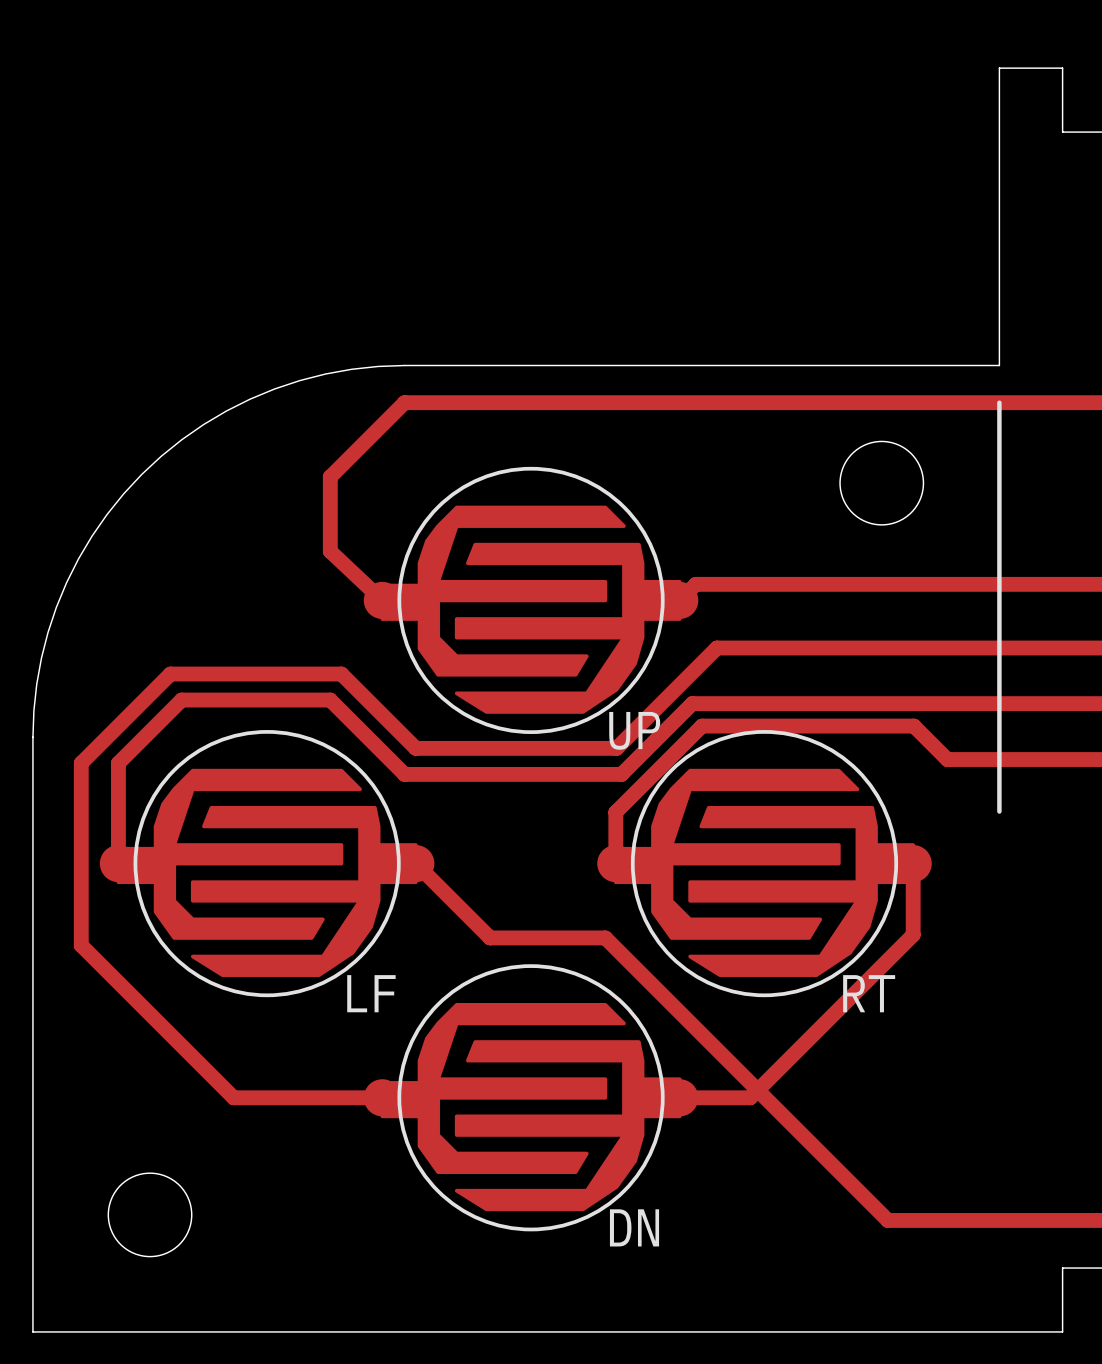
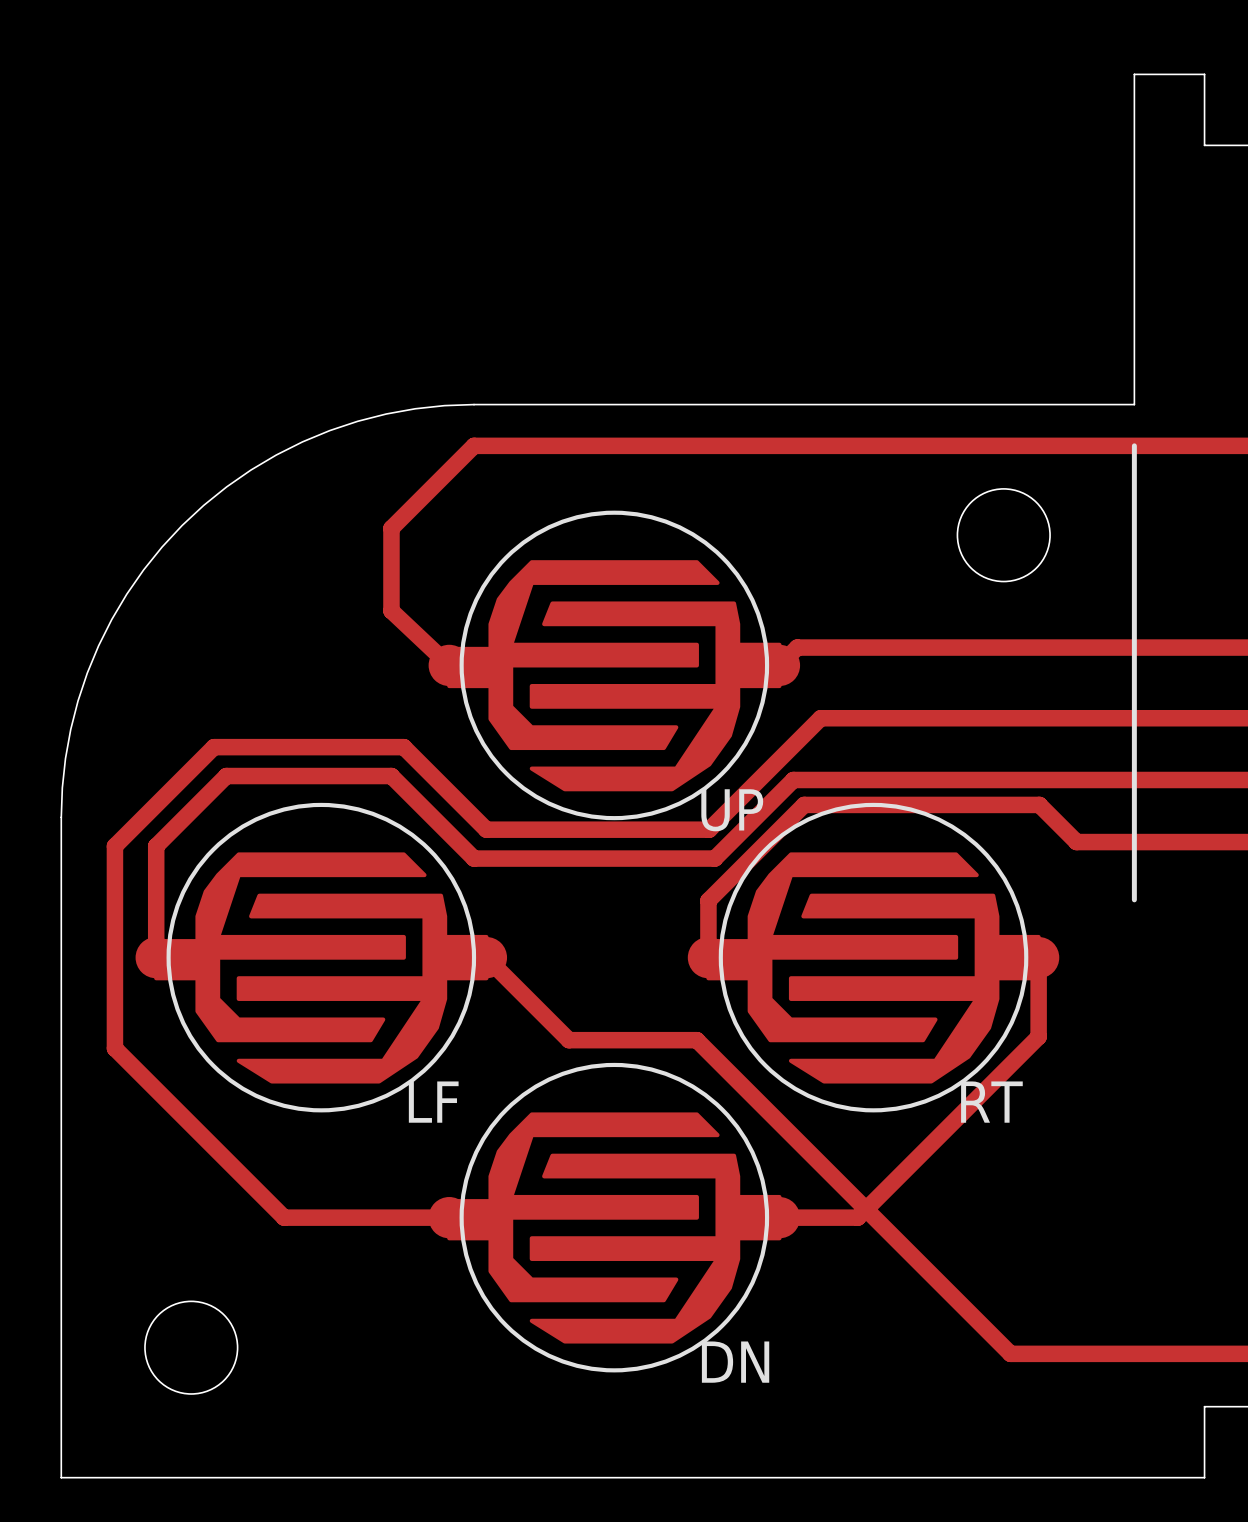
UP footprint: [363, 466, 699, 735] -> [428, 510, 801, 821]
LF footprint: [99, 730, 435, 998] -> [135, 802, 508, 1113]
RT footprint: [597, 730, 932, 998] -> [687, 802, 1060, 1113]
DN footprint: [363, 964, 699, 1232] -> [428, 1062, 801, 1373]

